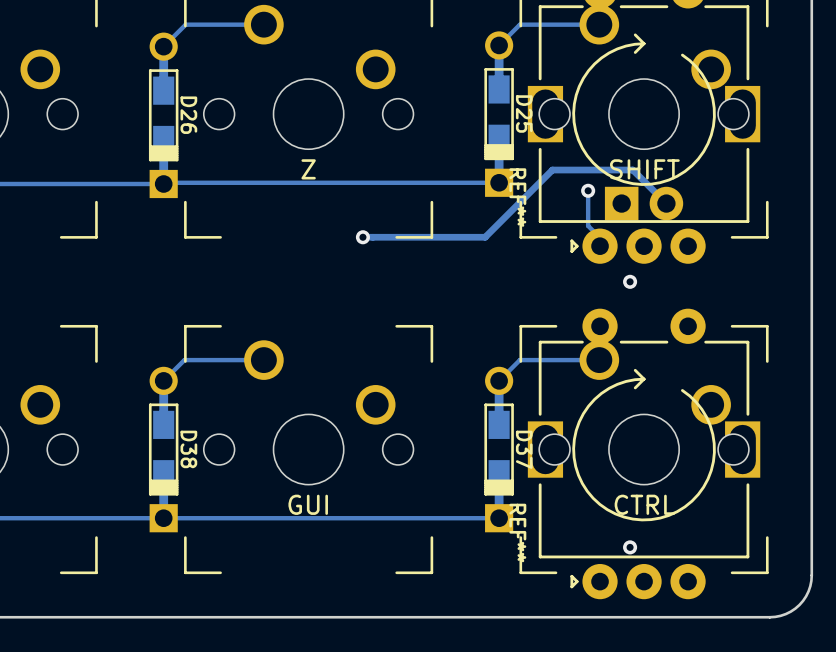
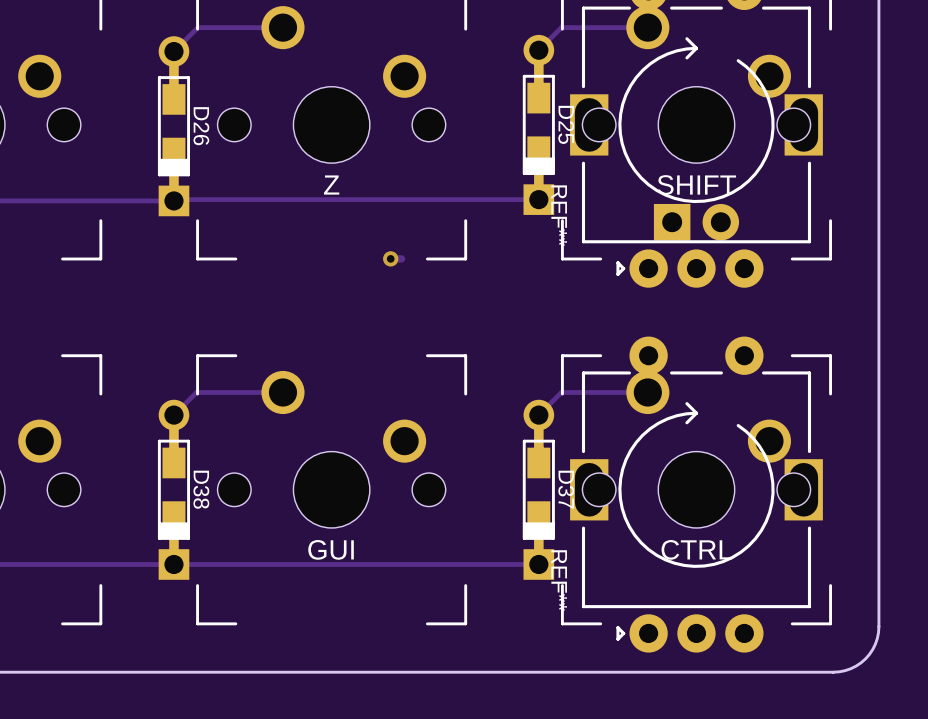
track: (588, 190) (588, 225) (600, 237) (600, 246) -> none
via: (588, 190) -> none
track: (666, 203) (632, 170) (552, 170) (485, 237) (372, 237) -> none
via: (630, 281) -> none
via: (630, 547) -> none

